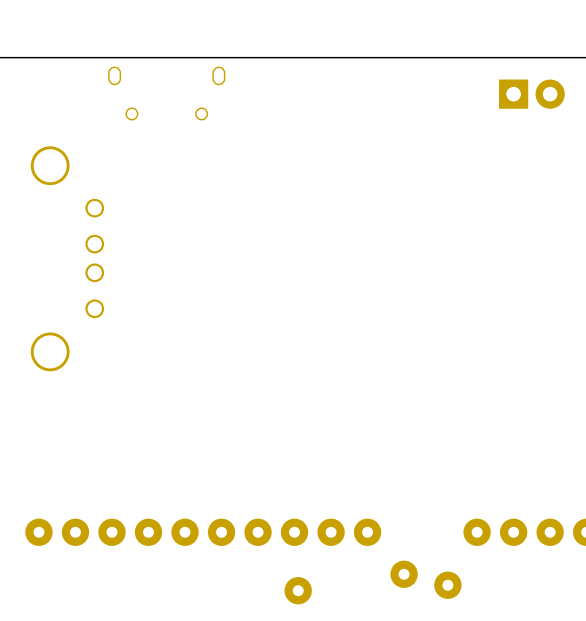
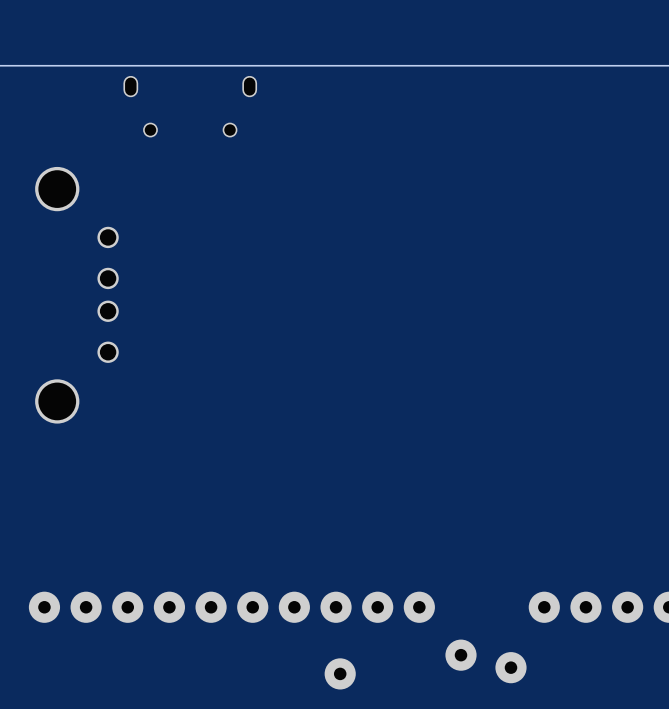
part: (531, 94) -> none

